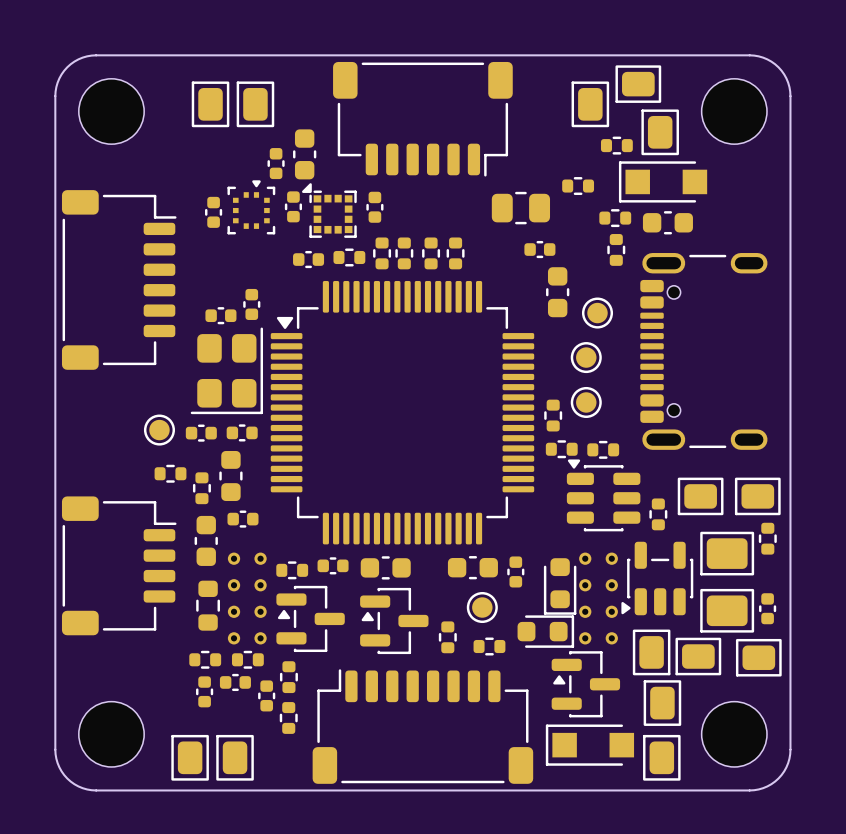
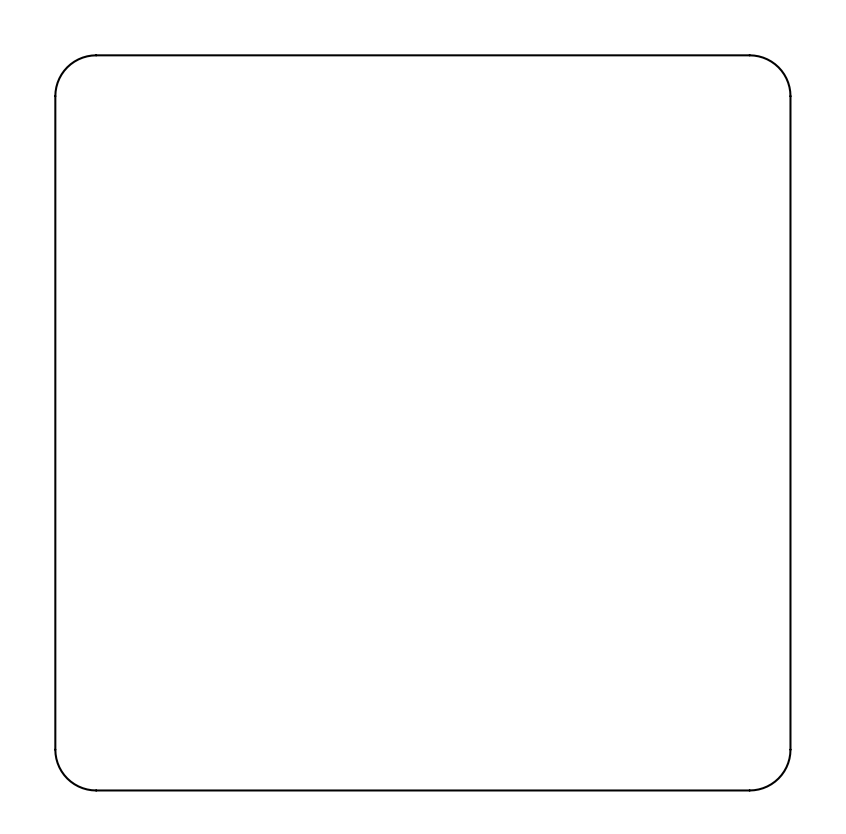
part: (638, 84) -> none
part: (210, 104) -> none
part: (255, 104) -> none
part: (590, 104) -> none
part: (111, 111) -> none
part: (734, 111) -> none
part: (422, 119) -> none
part: (660, 132) -> none
part: (616, 145) -> none
part: (304, 154) -> none
part: (276, 163) -> none
part: (663, 181) -> none
part: (578, 186) -> none
part: (293, 206) -> none
part: (251, 207) -> none
part: (374, 207) -> none
part: (520, 208) -> none
part: (329, 210) -> none
part: (213, 212) -> none
part: (615, 218) -> none
part: (667, 222) -> none
part: (539, 249) -> none
part: (616, 249) -> none
part: (382, 253) -> none
part: (404, 253) -> none
part: (431, 253) -> none
part: (455, 253) -> none
part: (349, 257) -> none
part: (308, 259) -> none
part: (119, 279) -> none
part: (557, 292) -> none
part: (251, 304) -> none
part: (597, 313) -> none
part: (220, 315) -> none
part: (703, 351) -> none
part: (586, 357) -> none
part: (226, 370) -> none
part: (586, 402) -> none
part: (402, 412) -> none
part: (553, 415) -> none
part: (159, 430) -> none
part: (242, 432) -> none
part: (201, 433) -> none
part: (561, 449) -> none
part: (603, 449) -> none
part: (170, 473) -> none
part: (230, 475) -> none
part: (201, 488) -> none
part: (603, 495) -> none
part: (700, 496) -> none
part: (757, 496) -> none
part: (658, 514) -> none
part: (242, 519) -> none
part: (767, 538) -> none
part: (206, 540) -> none
part: (727, 553) -> none
part: (119, 565) -> none
part: (333, 565) -> none
part: (385, 567) -> none
part: (472, 567) -> none
part: (292, 570) -> none
part: (515, 571) -> none
part: (657, 578) -> none
part: (560, 586) -> none
part: (247, 598) -> none
part: (598, 598) -> none
part: (208, 605) -> none
part: (482, 607) -> none
part: (767, 608) -> none
part: (727, 610) -> none
part: (310, 618) -> none
part: (394, 620) -> none
part: (545, 631) -> none
part: (447, 637) -> none
part: (489, 646) -> none
part: (651, 652) -> none
part: (698, 656) -> none
part: (758, 657) -> none
part: (205, 659) -> none
part: (247, 659) -> none
part: (288, 677) -> none
part: (235, 682) -> none
part: (585, 684) -> none
part: (204, 691) -> none
part: (266, 695) -> none
part: (662, 703) -> none
part: (288, 717) -> none
part: (422, 726) -> none
part: (111, 734) -> none
part: (734, 734) -> none
part: (589, 745) -> none
part: (190, 757) -> none
part: (235, 757) -> none
part: (661, 757) -> none

